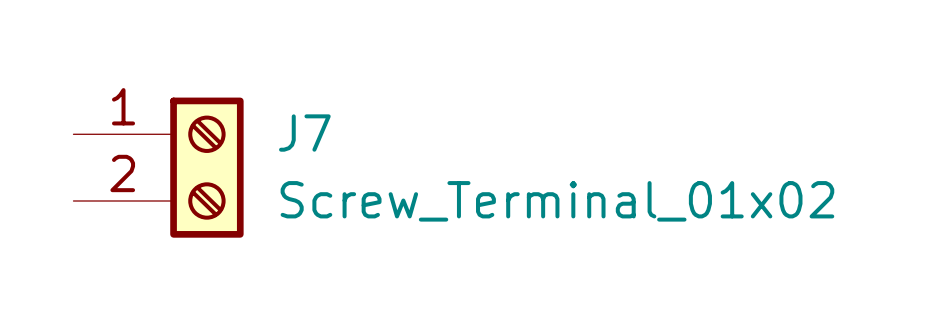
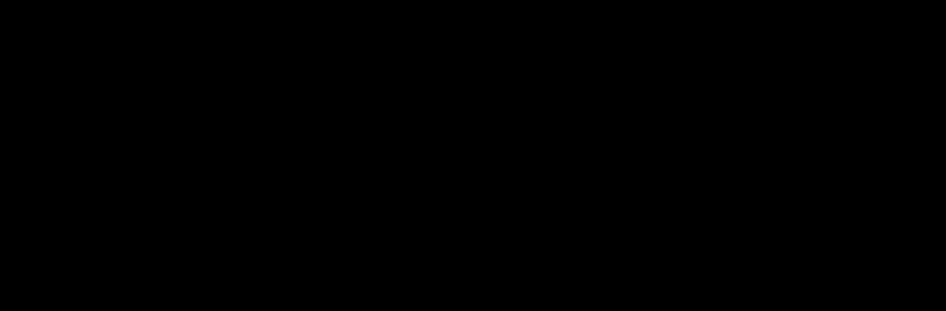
J7: Screw_Terminal_01x02 (158, 167) -> none

